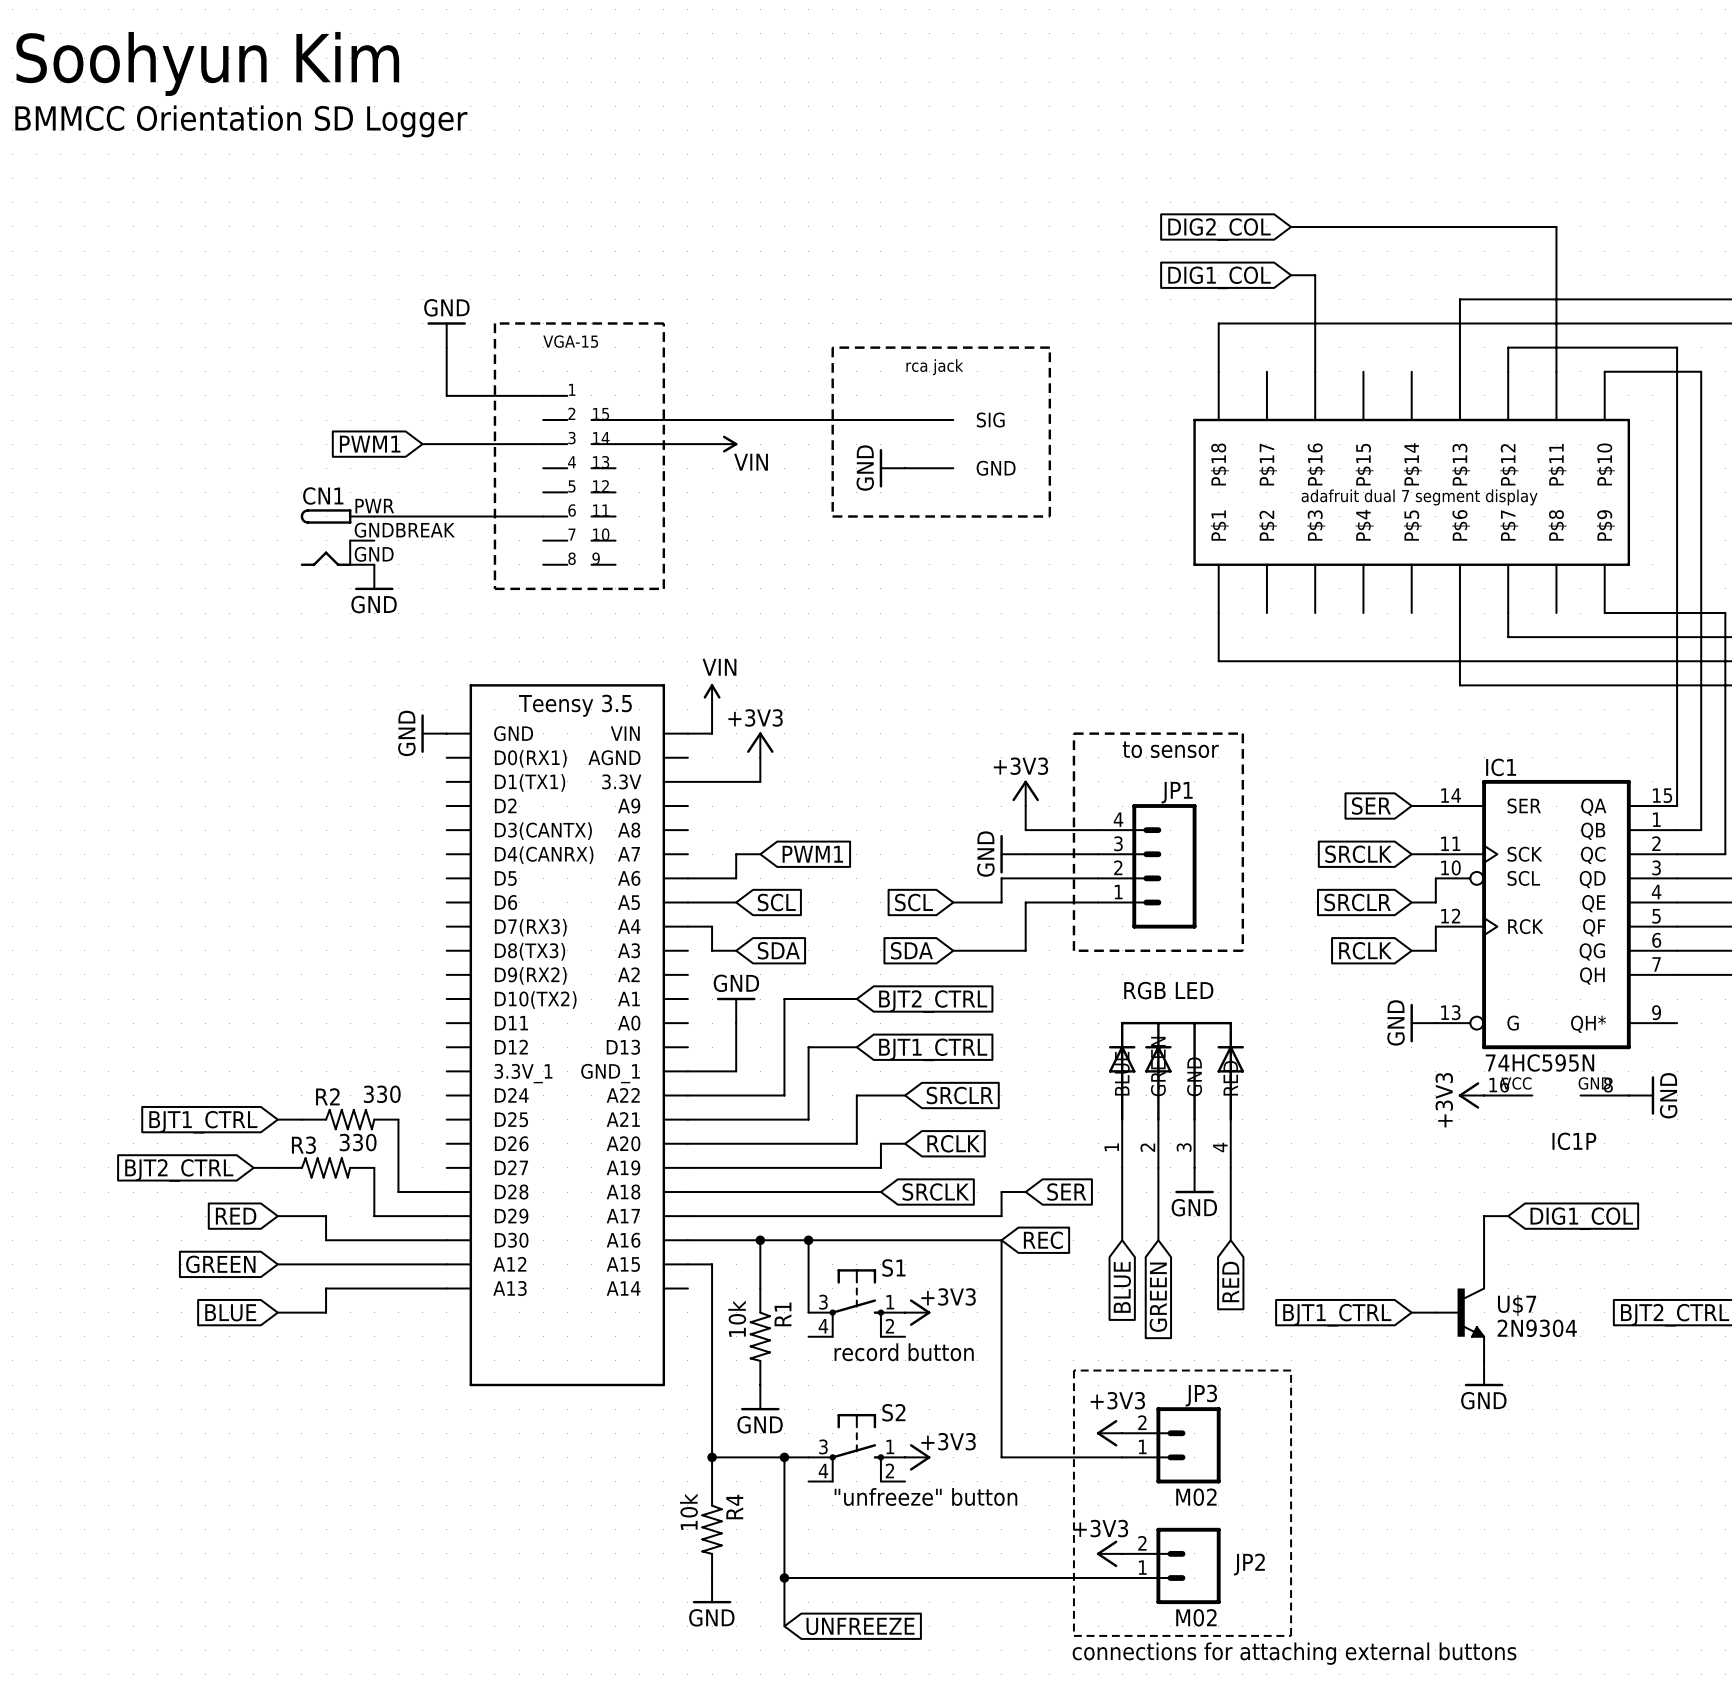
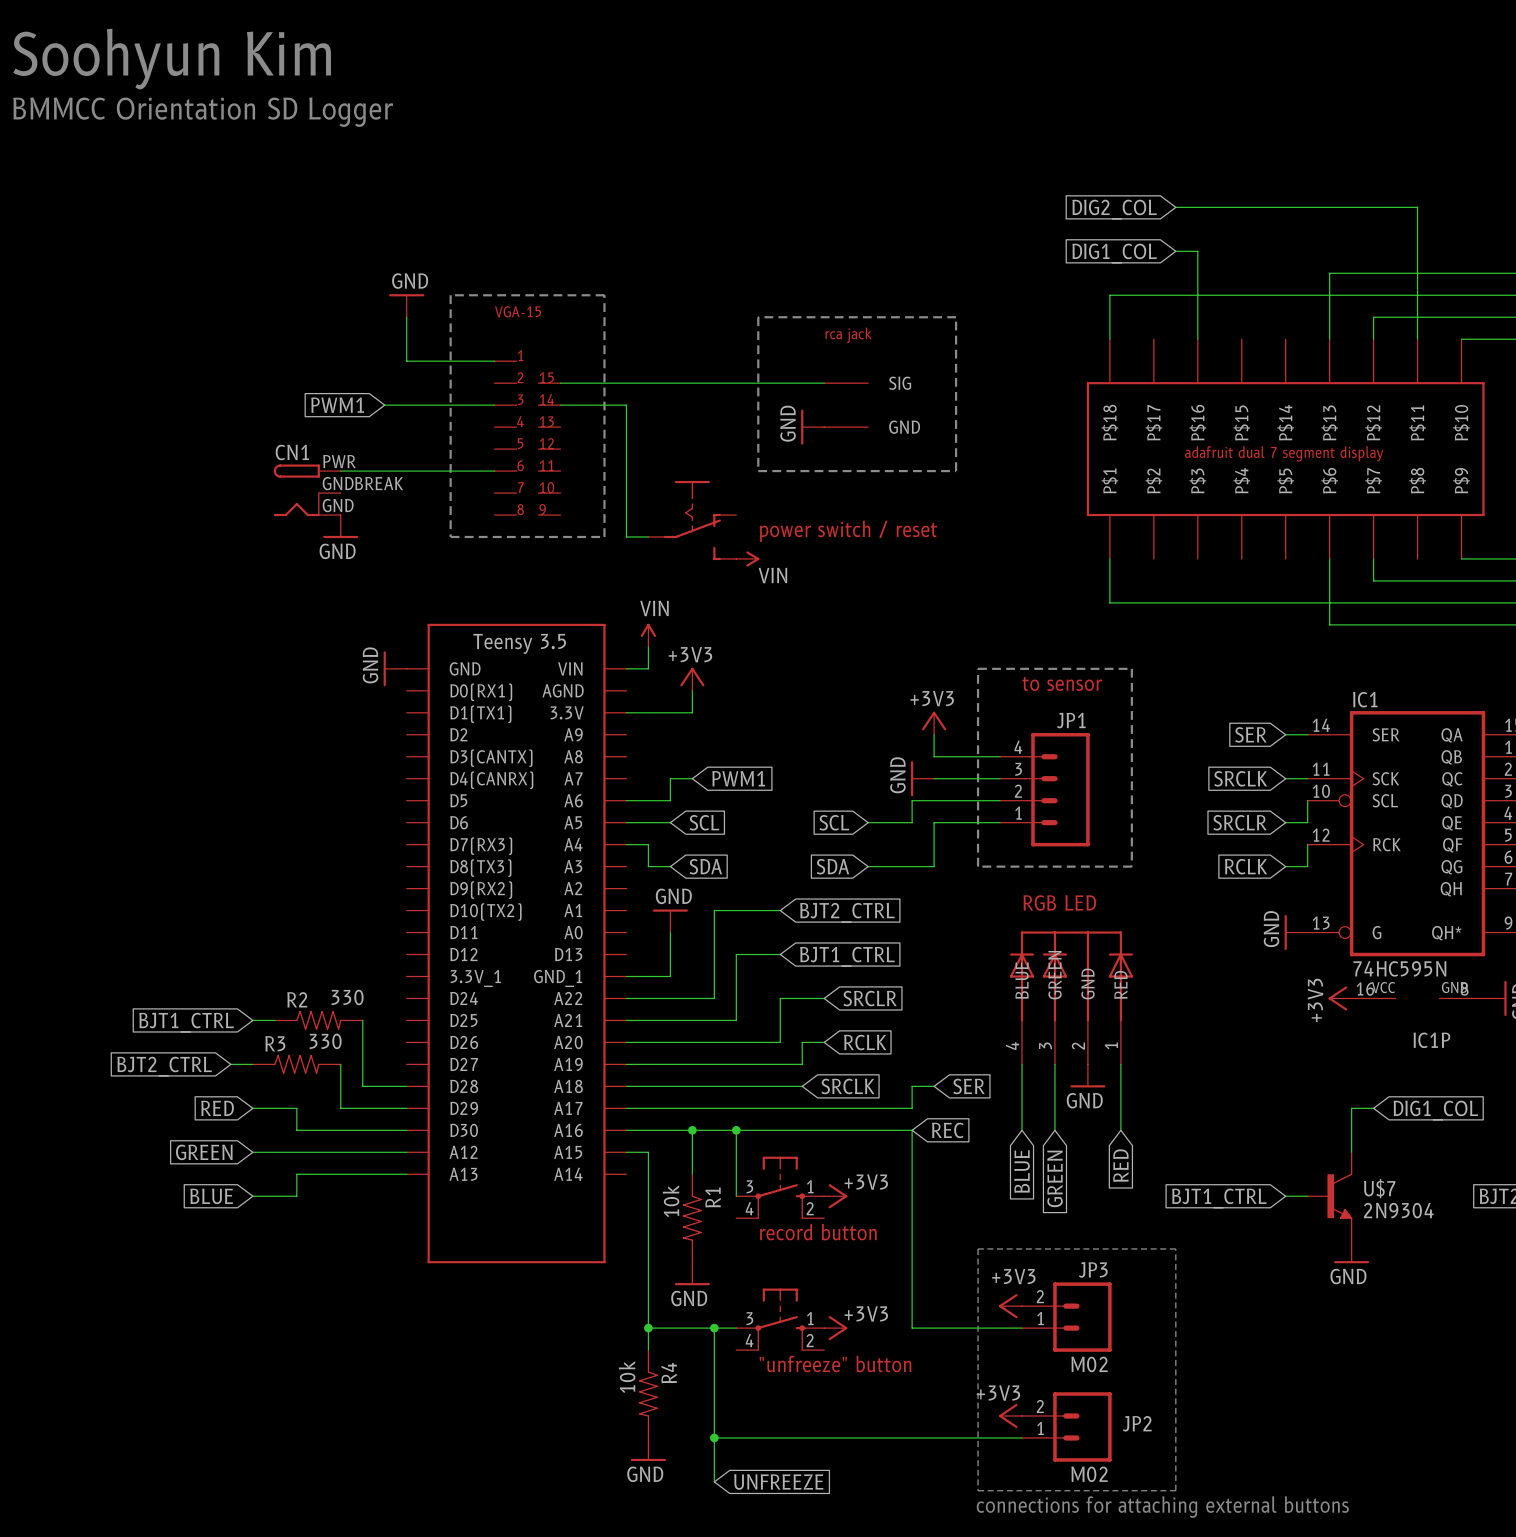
wire: (687, 444) (712, 444) -> (626, 405) (626, 536) (648, 536)
power symbol position: VIN (724, 444) -> VIN (747, 558)
part: none -> (692, 520)
text: none -> power switch / reset (848, 531)
part pin number: 1 (1111, 1147) -> 4 (1012, 1046)
part pin number: 2 (1147, 1147) -> 3 (1045, 1045)
part pin number: 3 (1184, 1147) -> 2 (1078, 1046)
part pin number: 4 (1220, 1147) -> 1 (1111, 1045)
S1 name: S1 (893, 1268) -> none
S2 name: S2 (893, 1412) -> none

